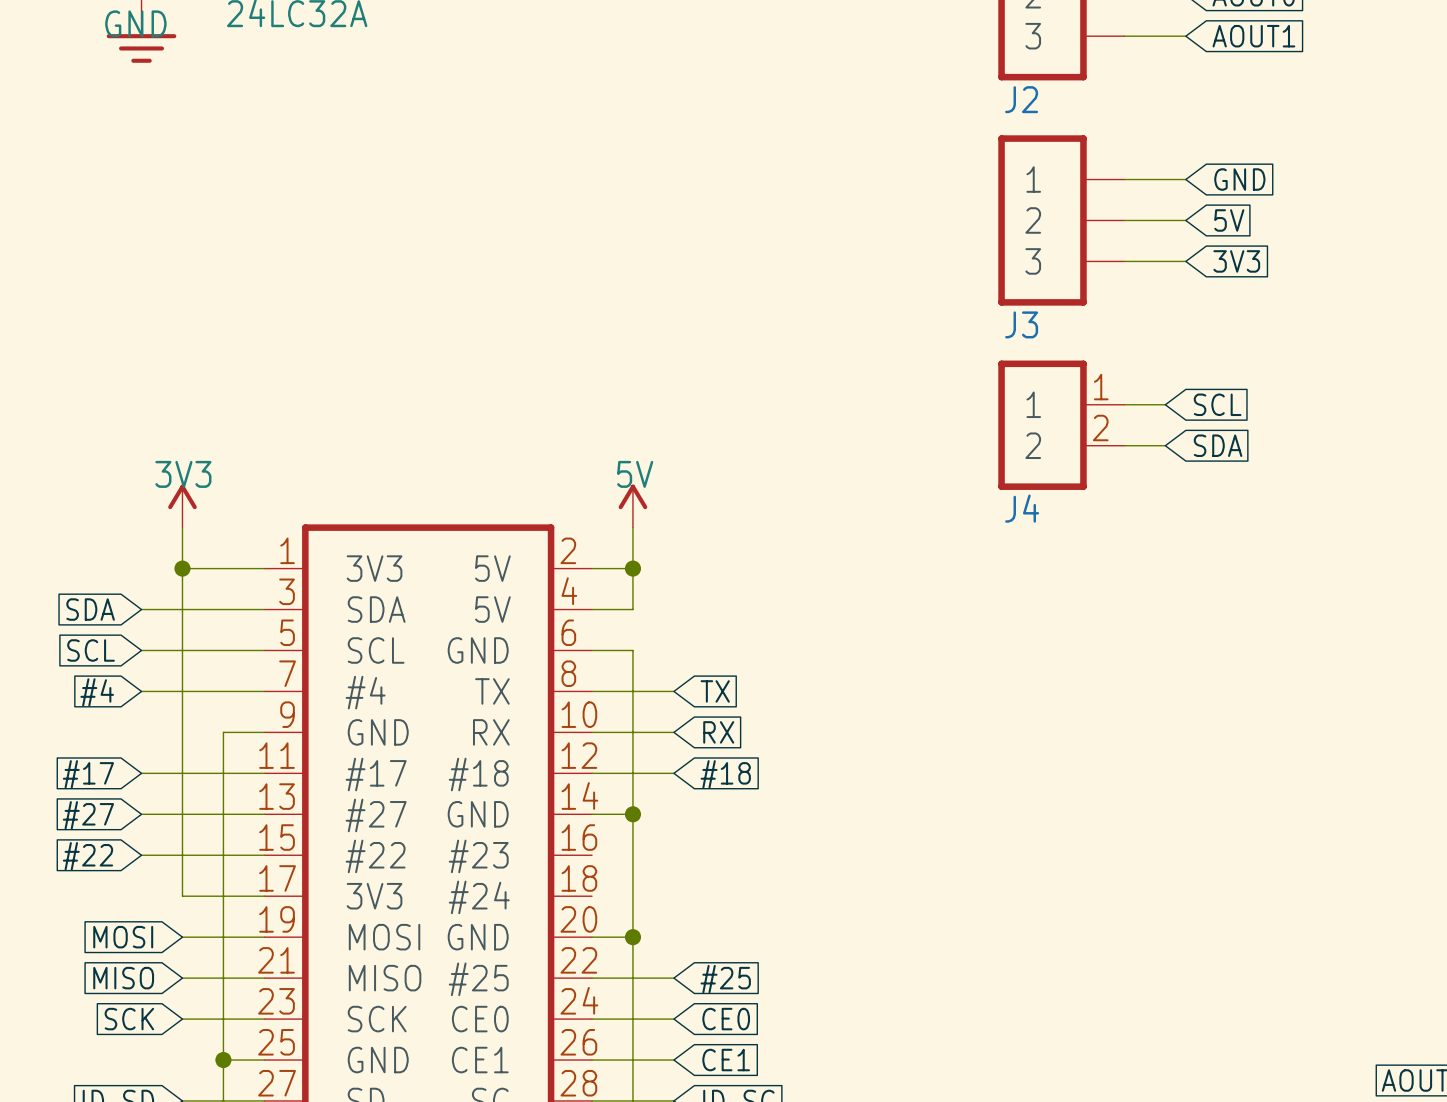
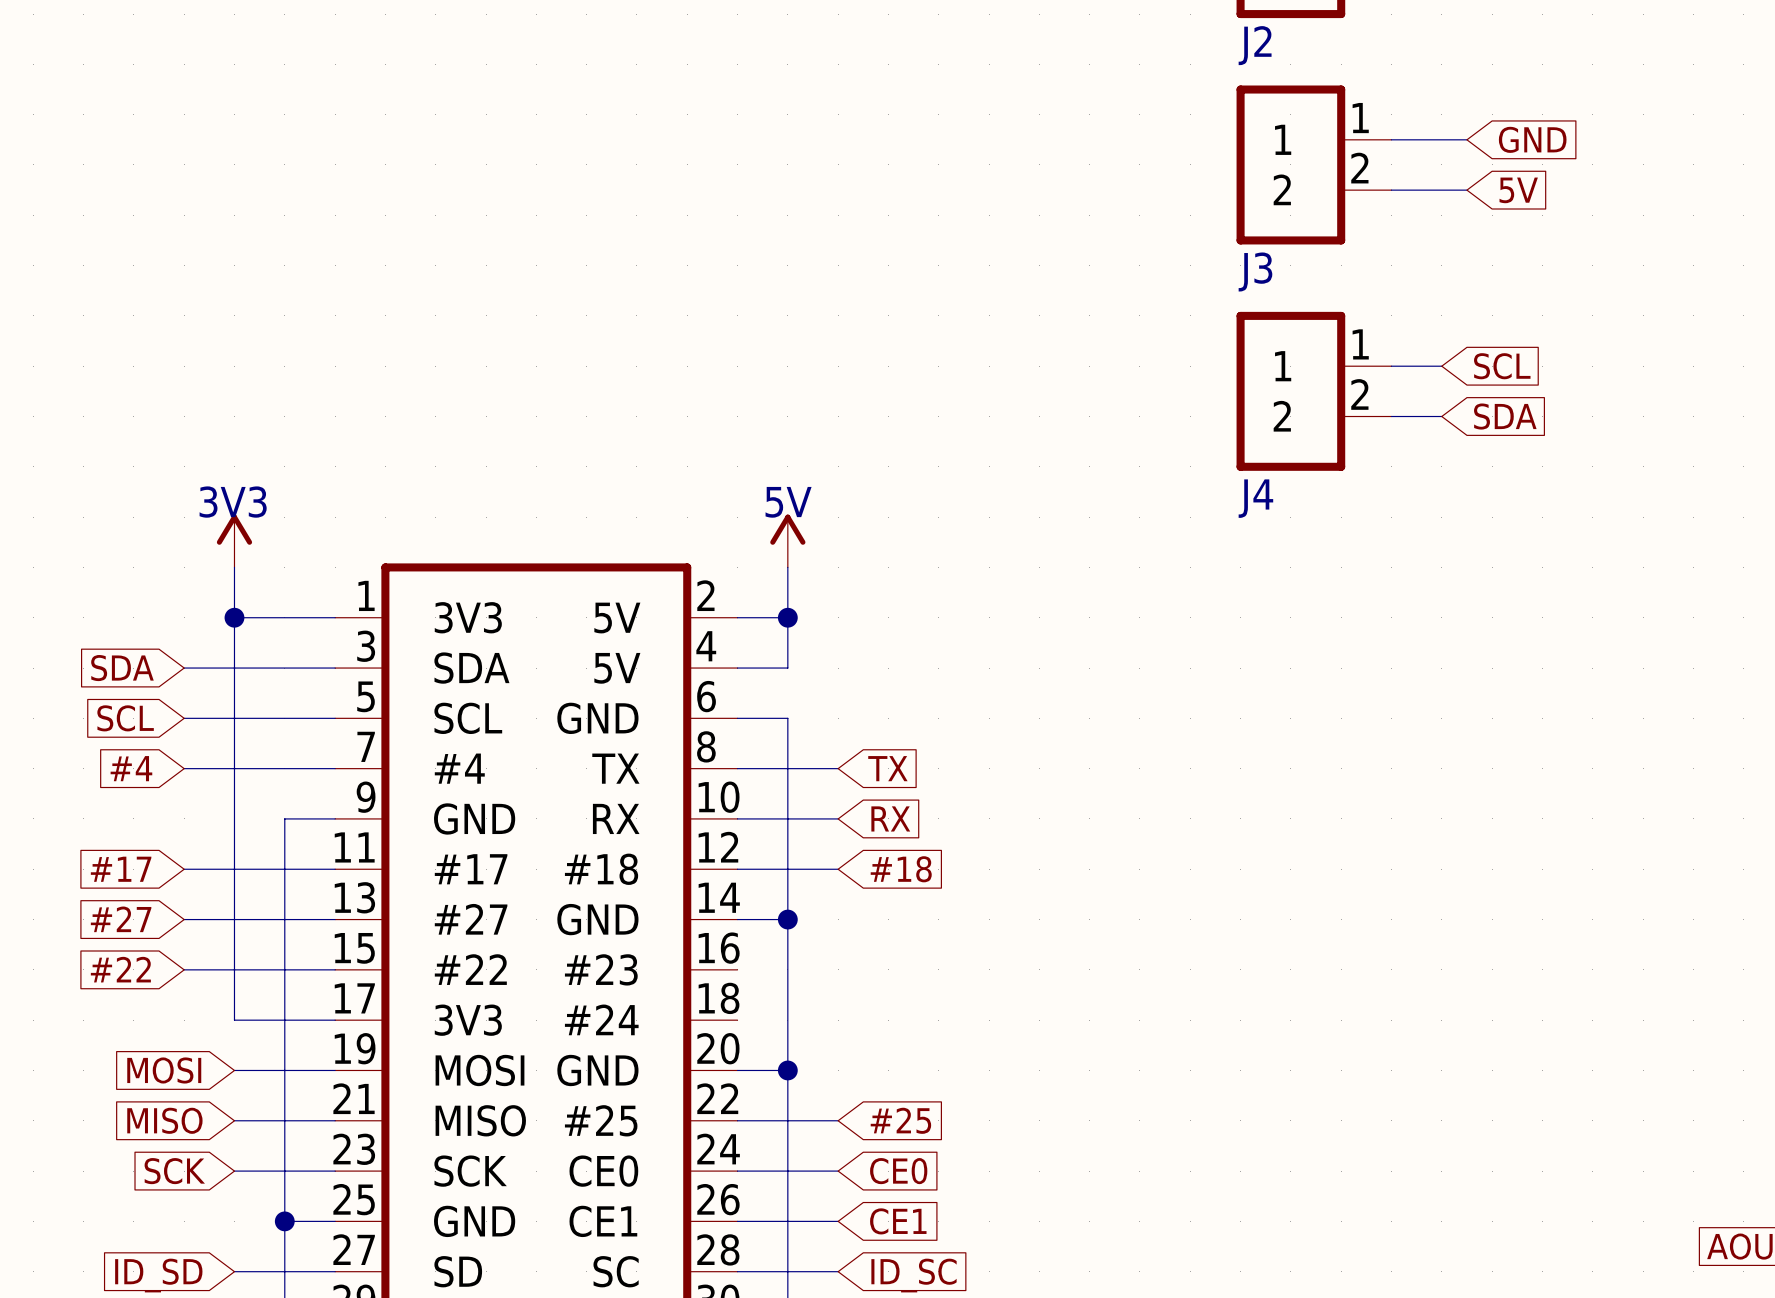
J3 symbol: [998, 135, 1125, 306] -> [1236, 85, 1392, 245]
wire: (1124, 261) (1185, 261) -> none
global label: 3V3 (1236, 261) -> none
global label: none -> SCL (1502, 366)
global label: SCL (1217, 404) -> SDA (1505, 416)
J4 position: (1061, 425) -> (1314, 391)
wire: (1124, 445) (1165, 445) -> (1391, 366) (1441, 366)
global label: SDA (1218, 445) -> none

